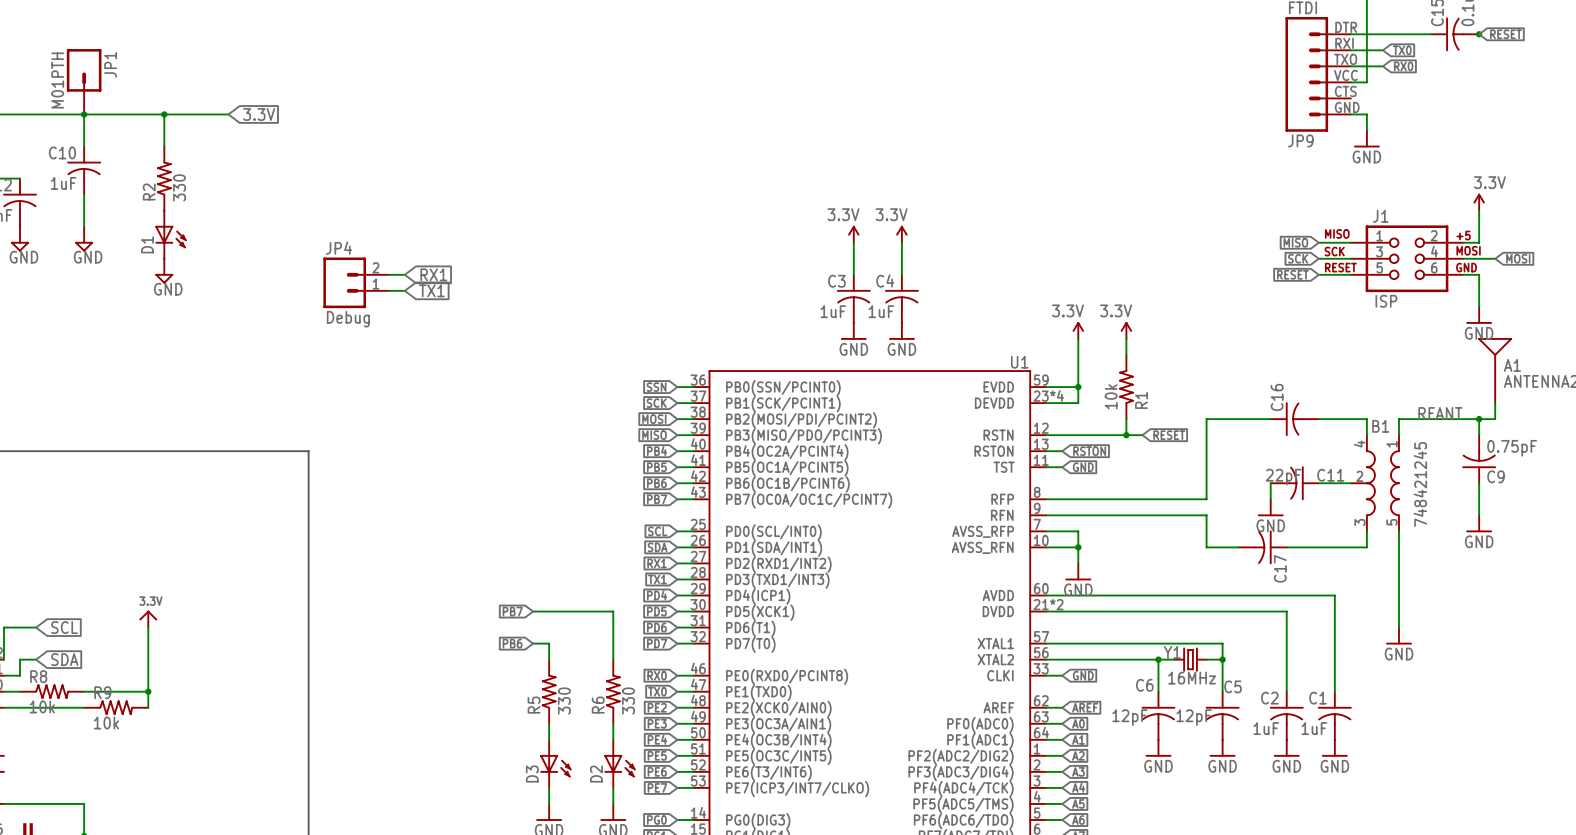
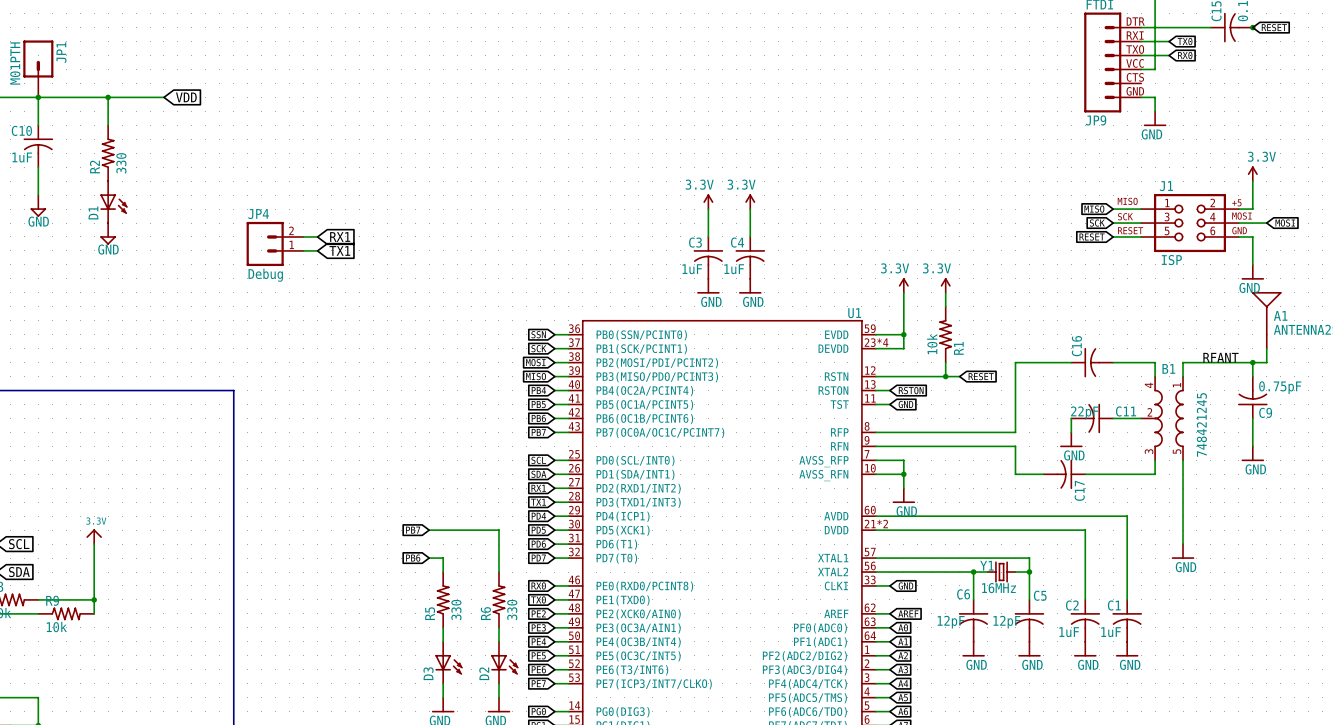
global label: 3.3V (259, 114) -> VDD (186, 97)

